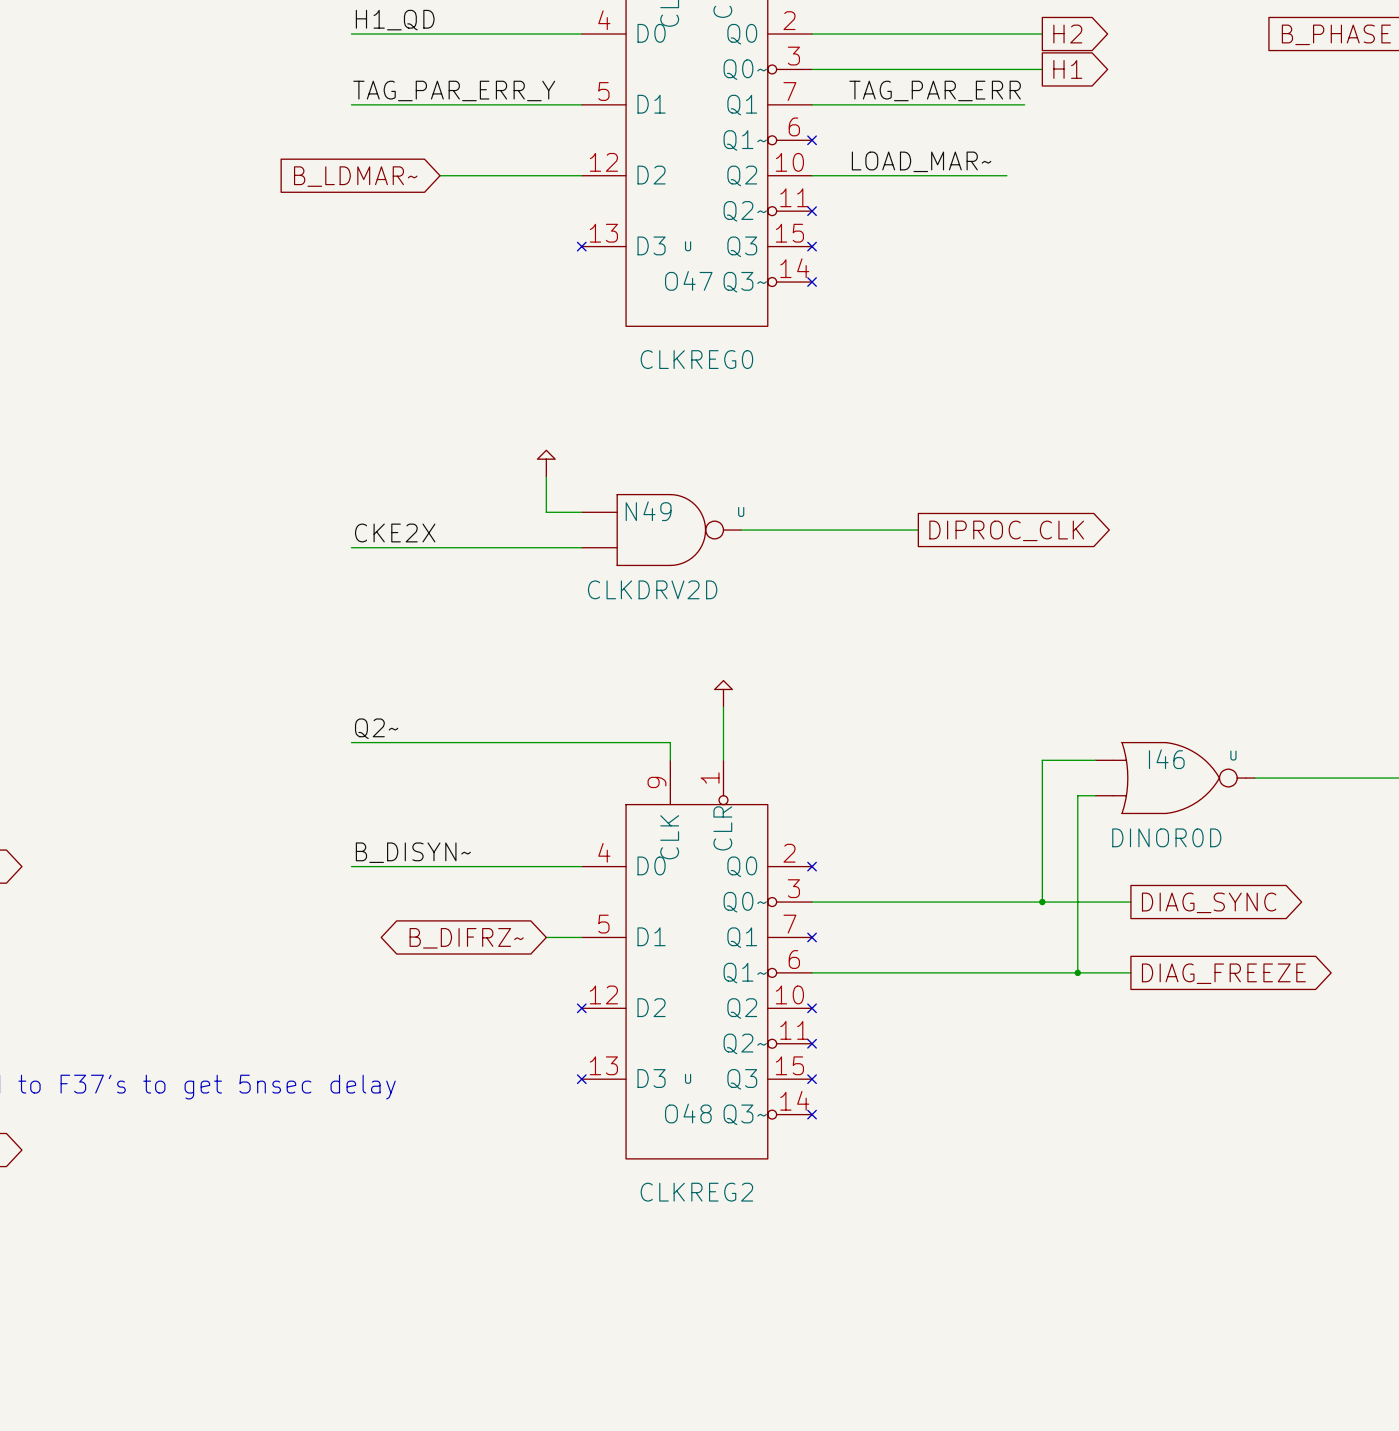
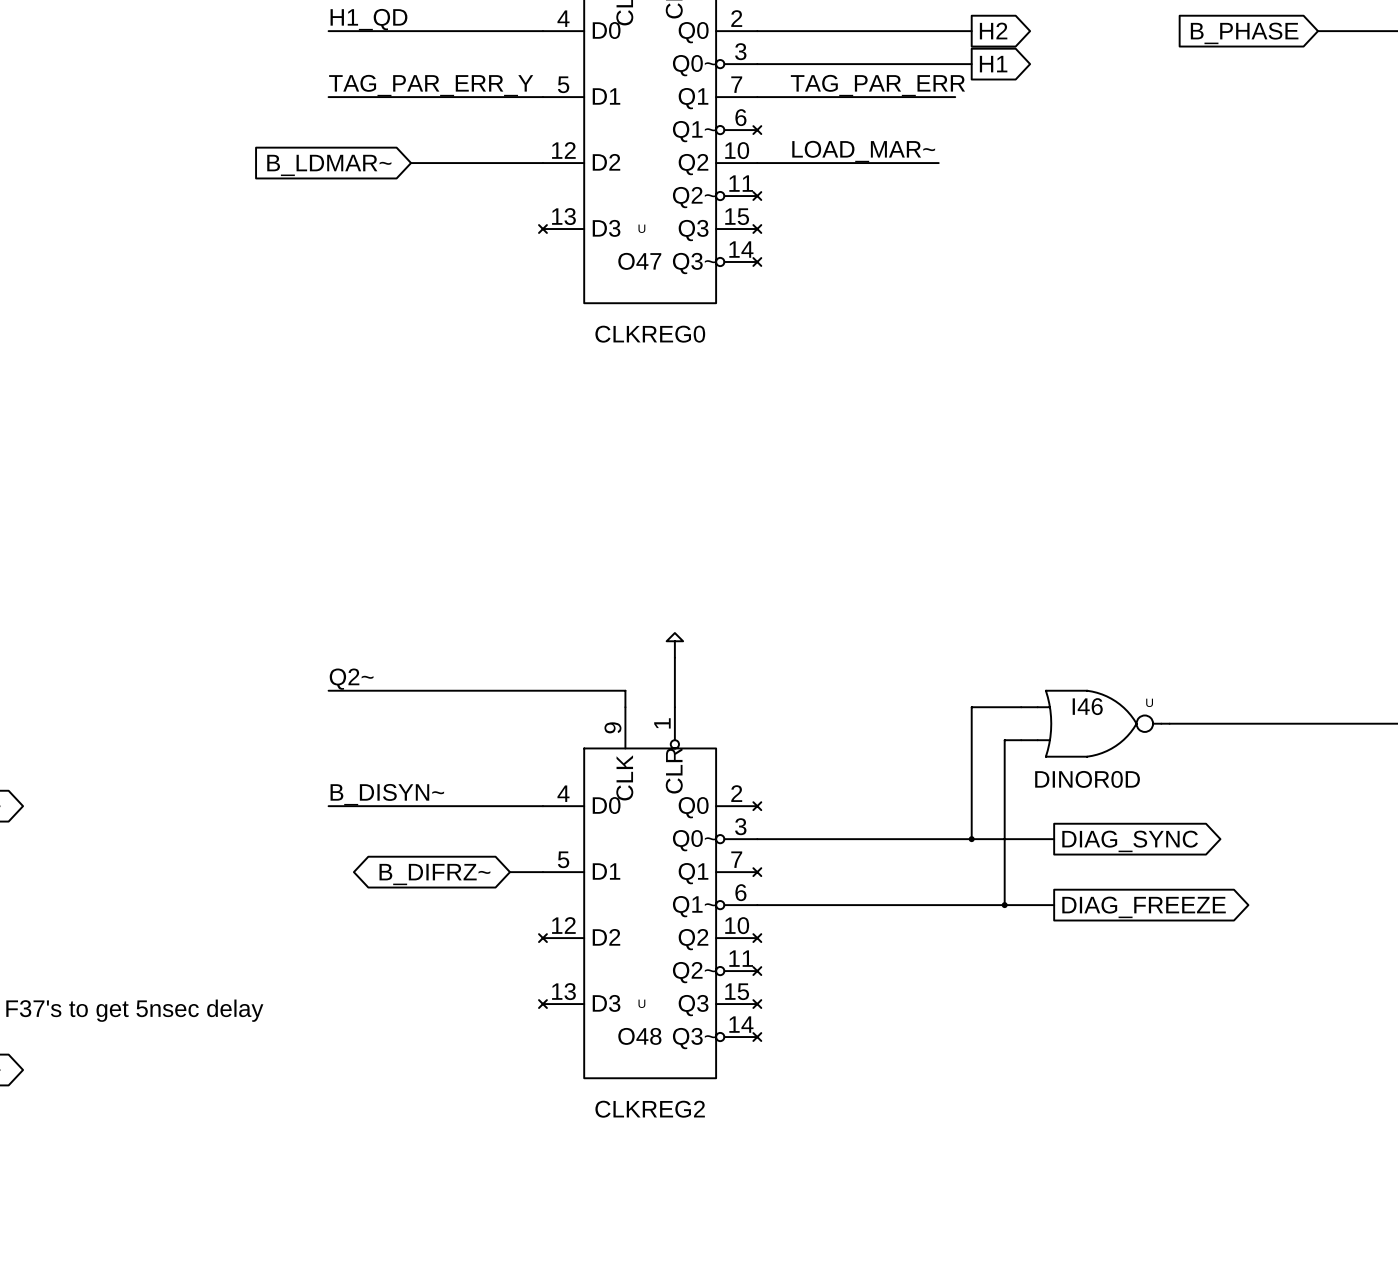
power symbol: (546, 463) -> none
wire: (546, 476) (546, 512) (581, 512) -> none
U: (661, 530) -> none
wire: (741, 530) (918, 530) -> none
global label: DIPROC_CLK (1006, 530) -> none
label: CKE2X (395, 532) -> none
wire: (351, 547) (581, 547) -> none

